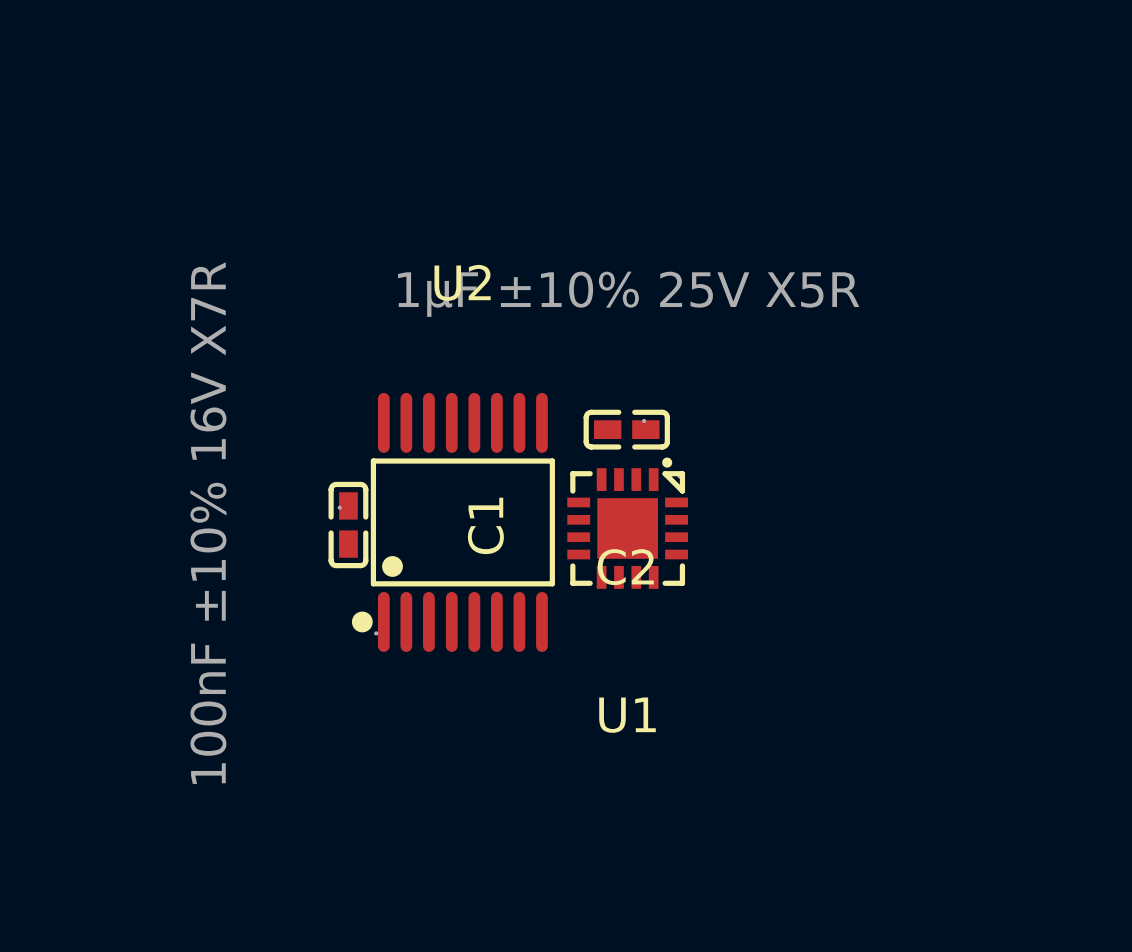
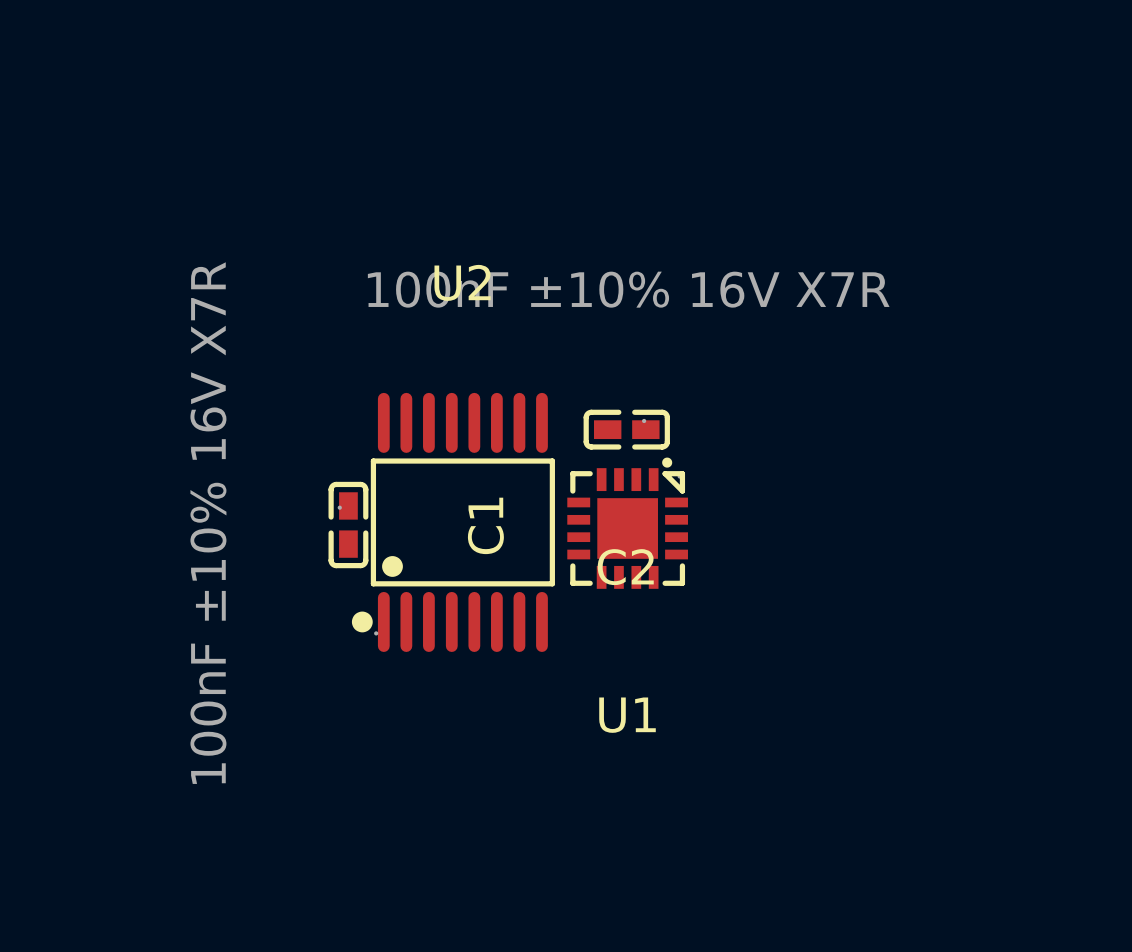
C2 value: 1µF ±10% 25V X5R (628, 294) -> 100nF ±10% 16V X7R (628, 289)

